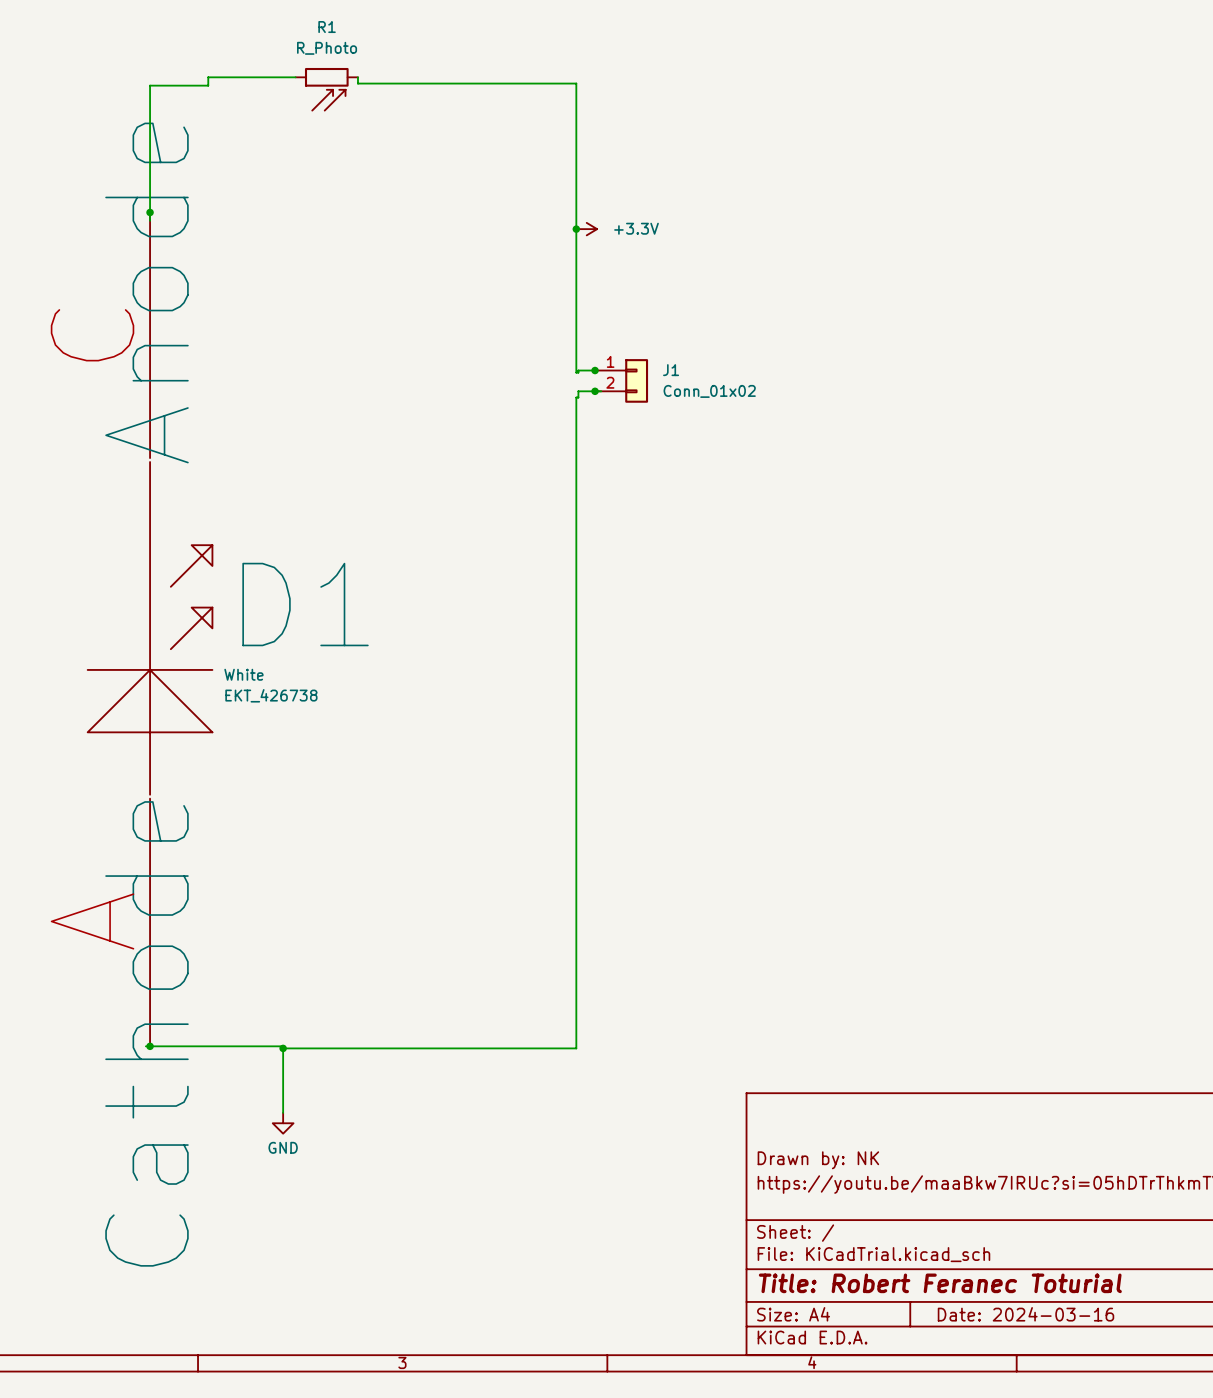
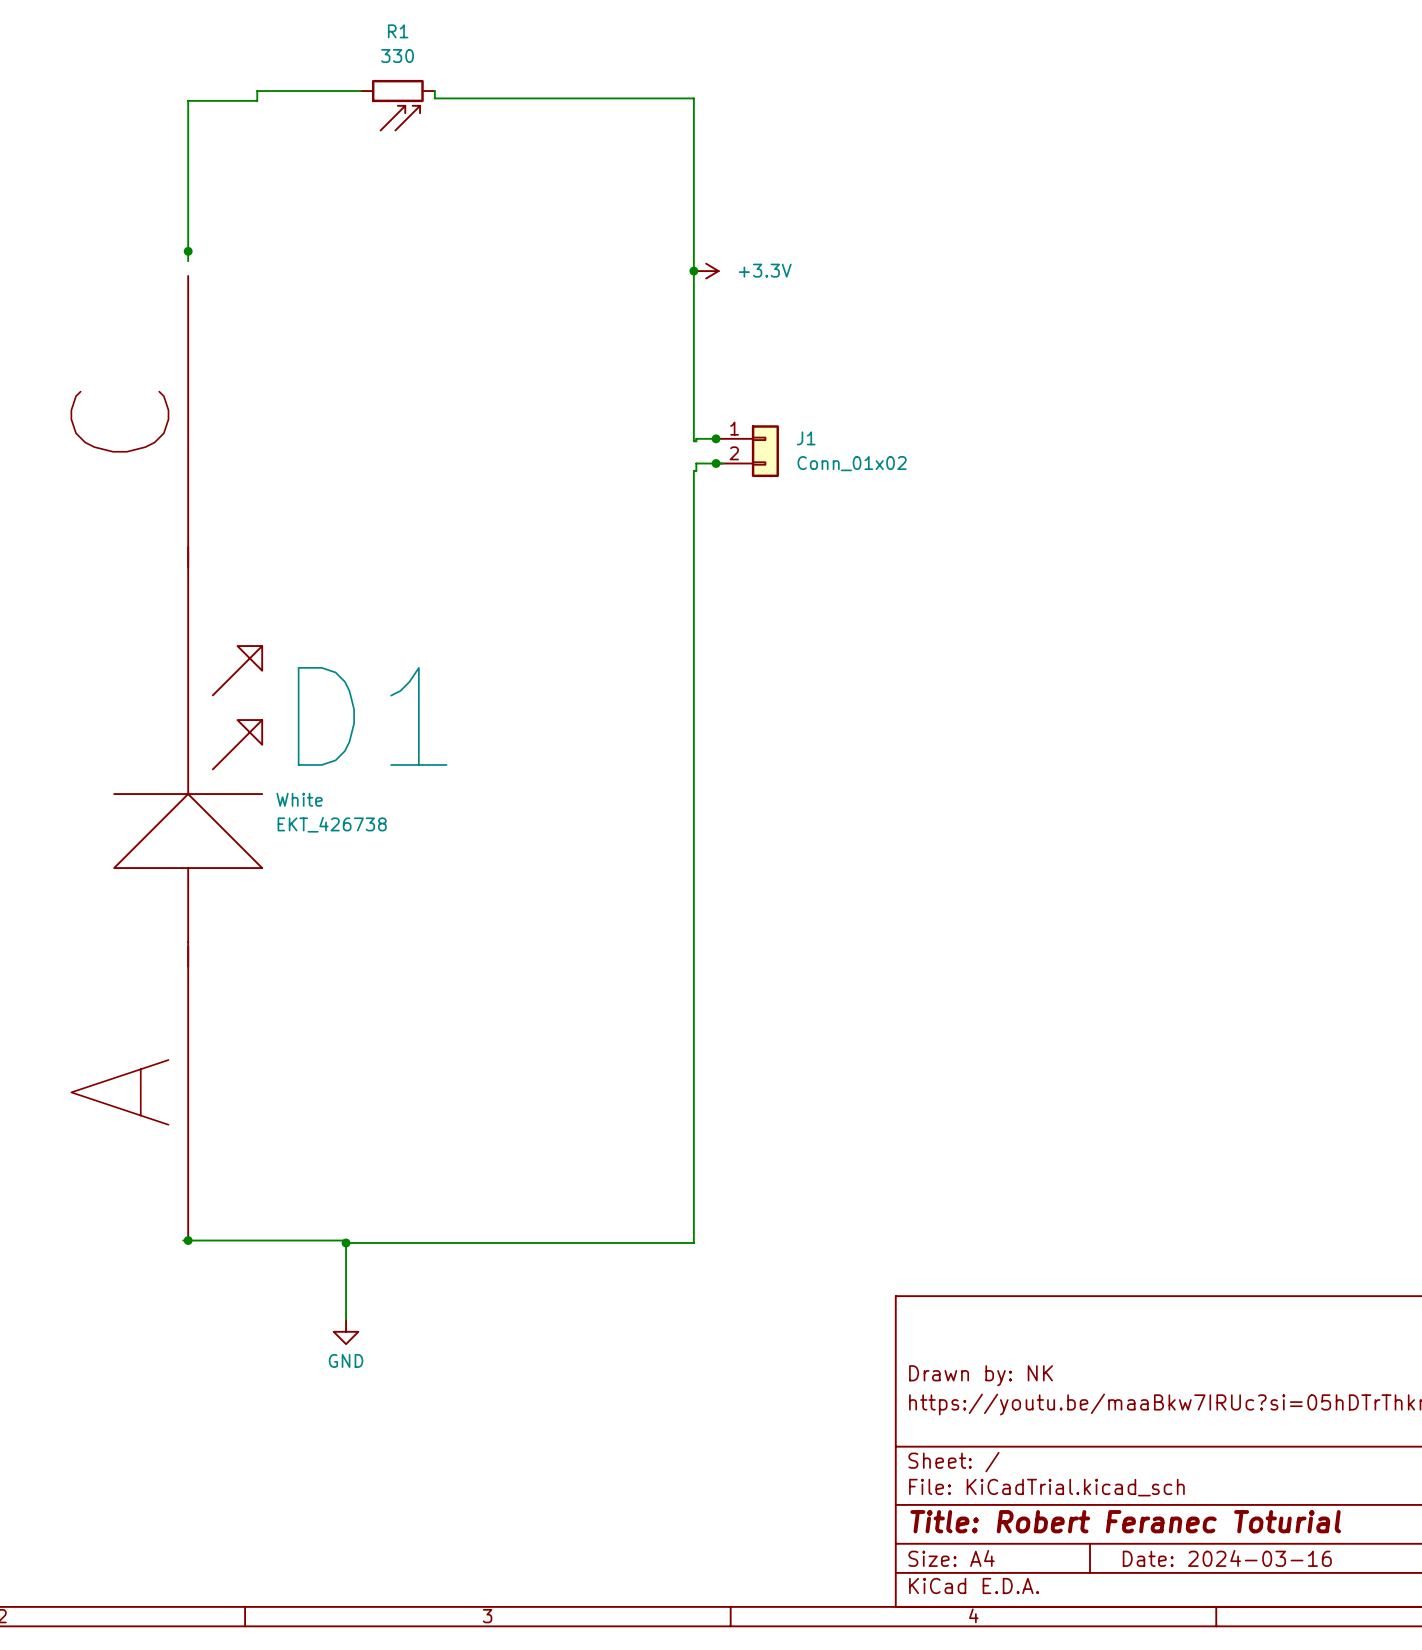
R1 value: R_Photo (327, 48) -> 330 (397, 56)
D1 symbol: [87, 212, 213, 1045] -> [114, 276, 263, 1239]

